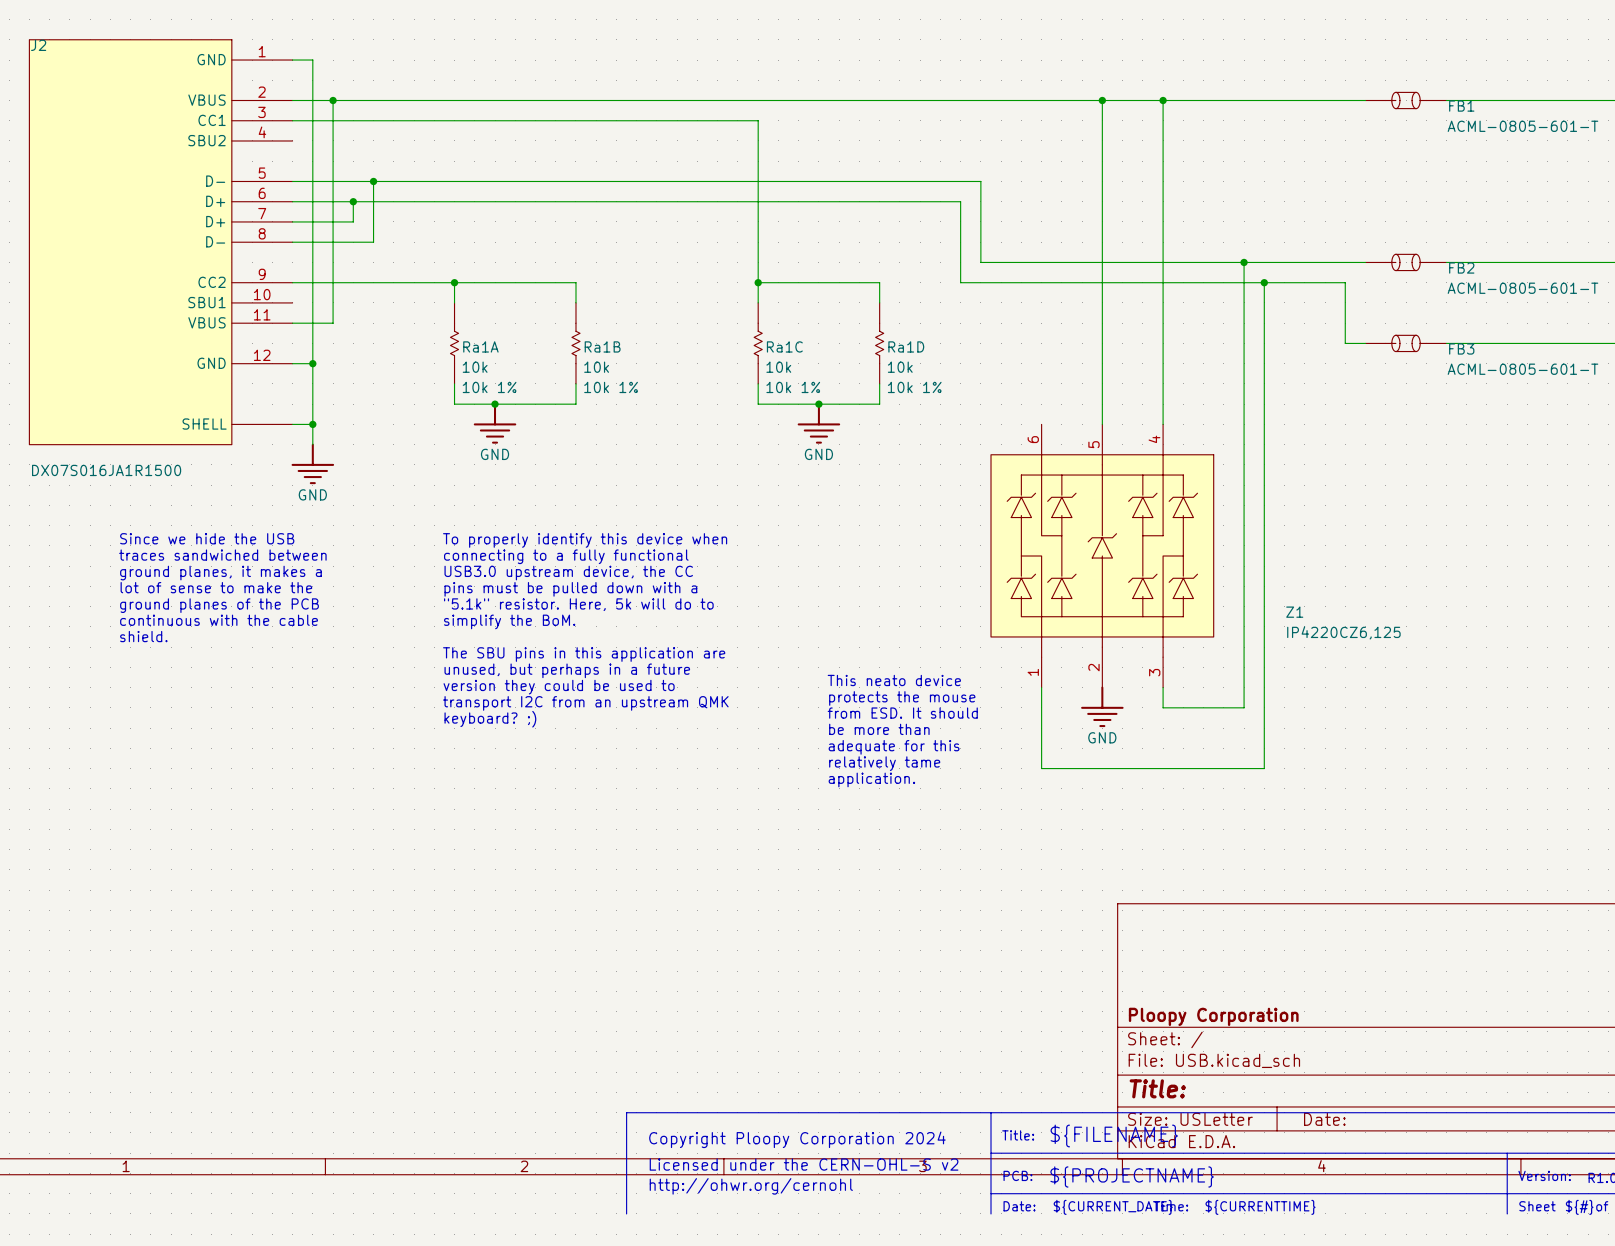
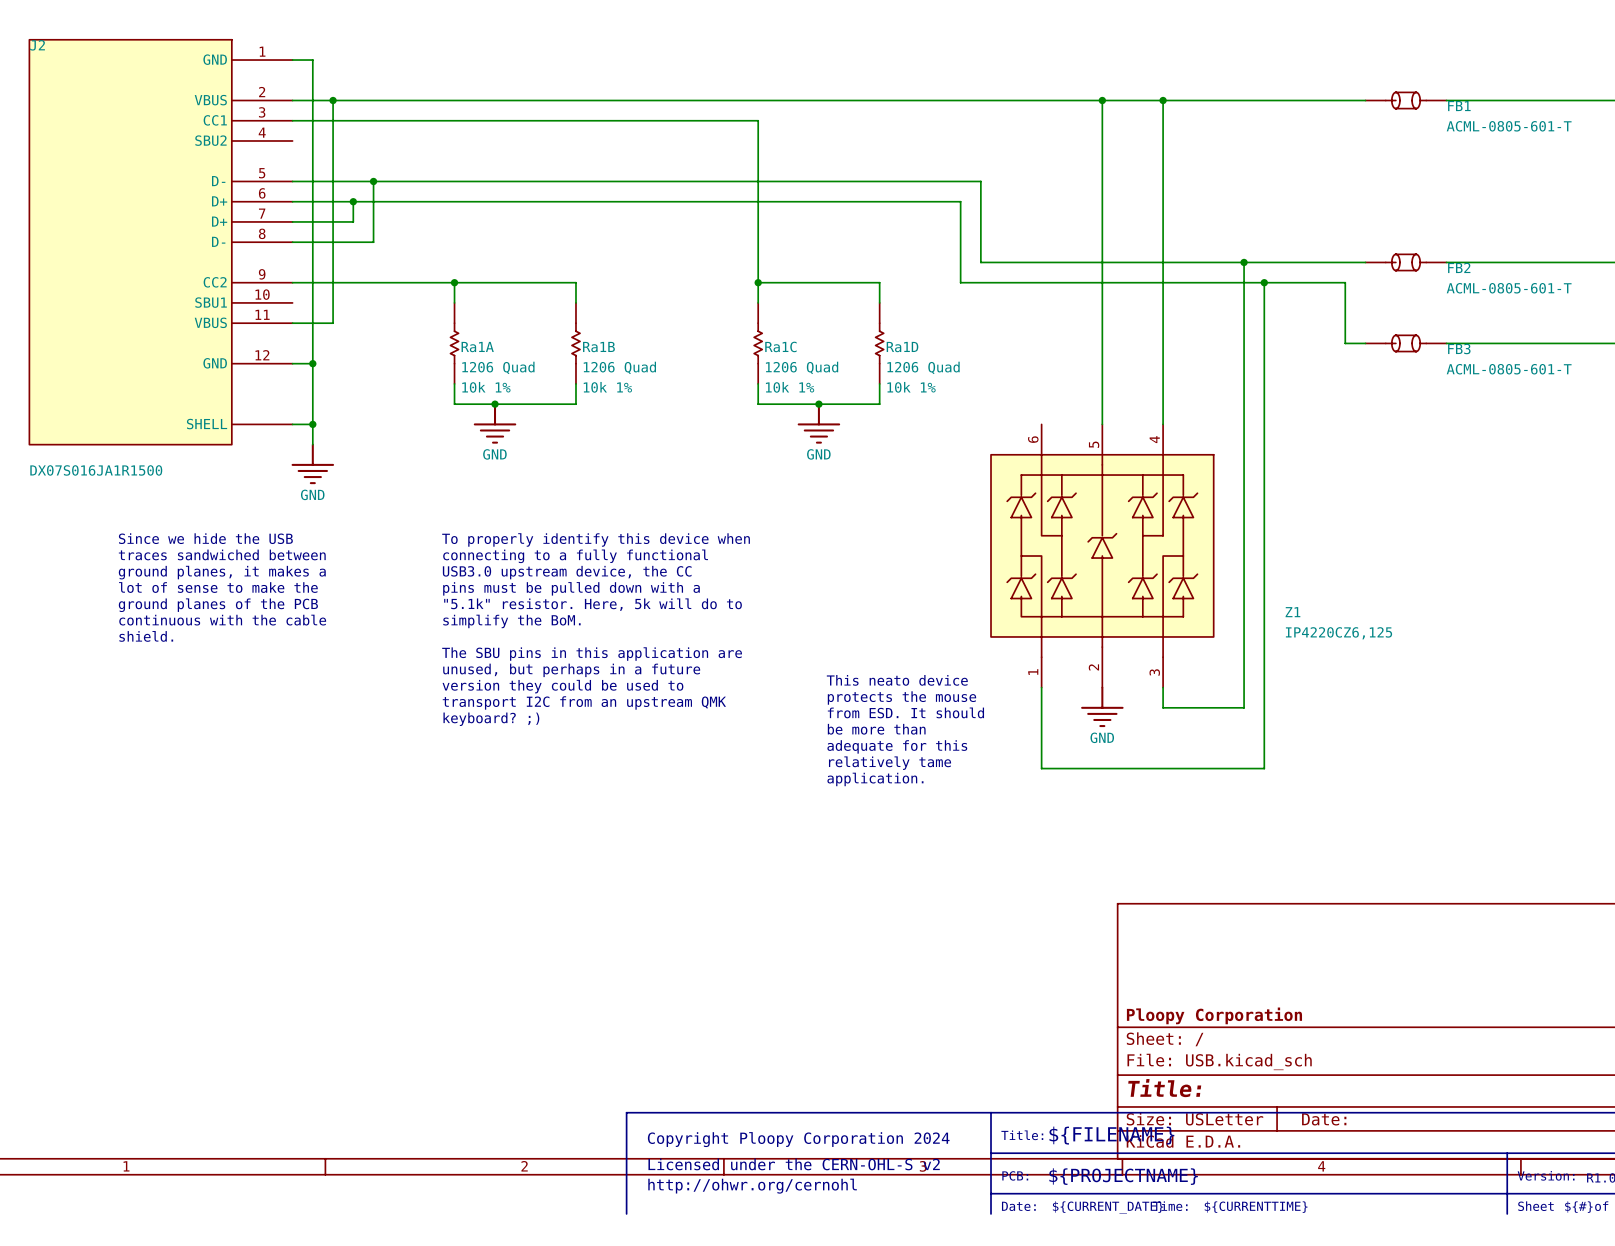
Ra1A value: 10k (475, 367) -> 1206 Quad (498, 367)
Ra1B value: 10k (596, 367) -> 1206 Quad (619, 367)
Ra1C value: 10k (778, 367) -> 1206 Quad (802, 367)
Ra1D value: 10k (900, 367) -> 1206 Quad (923, 367)

